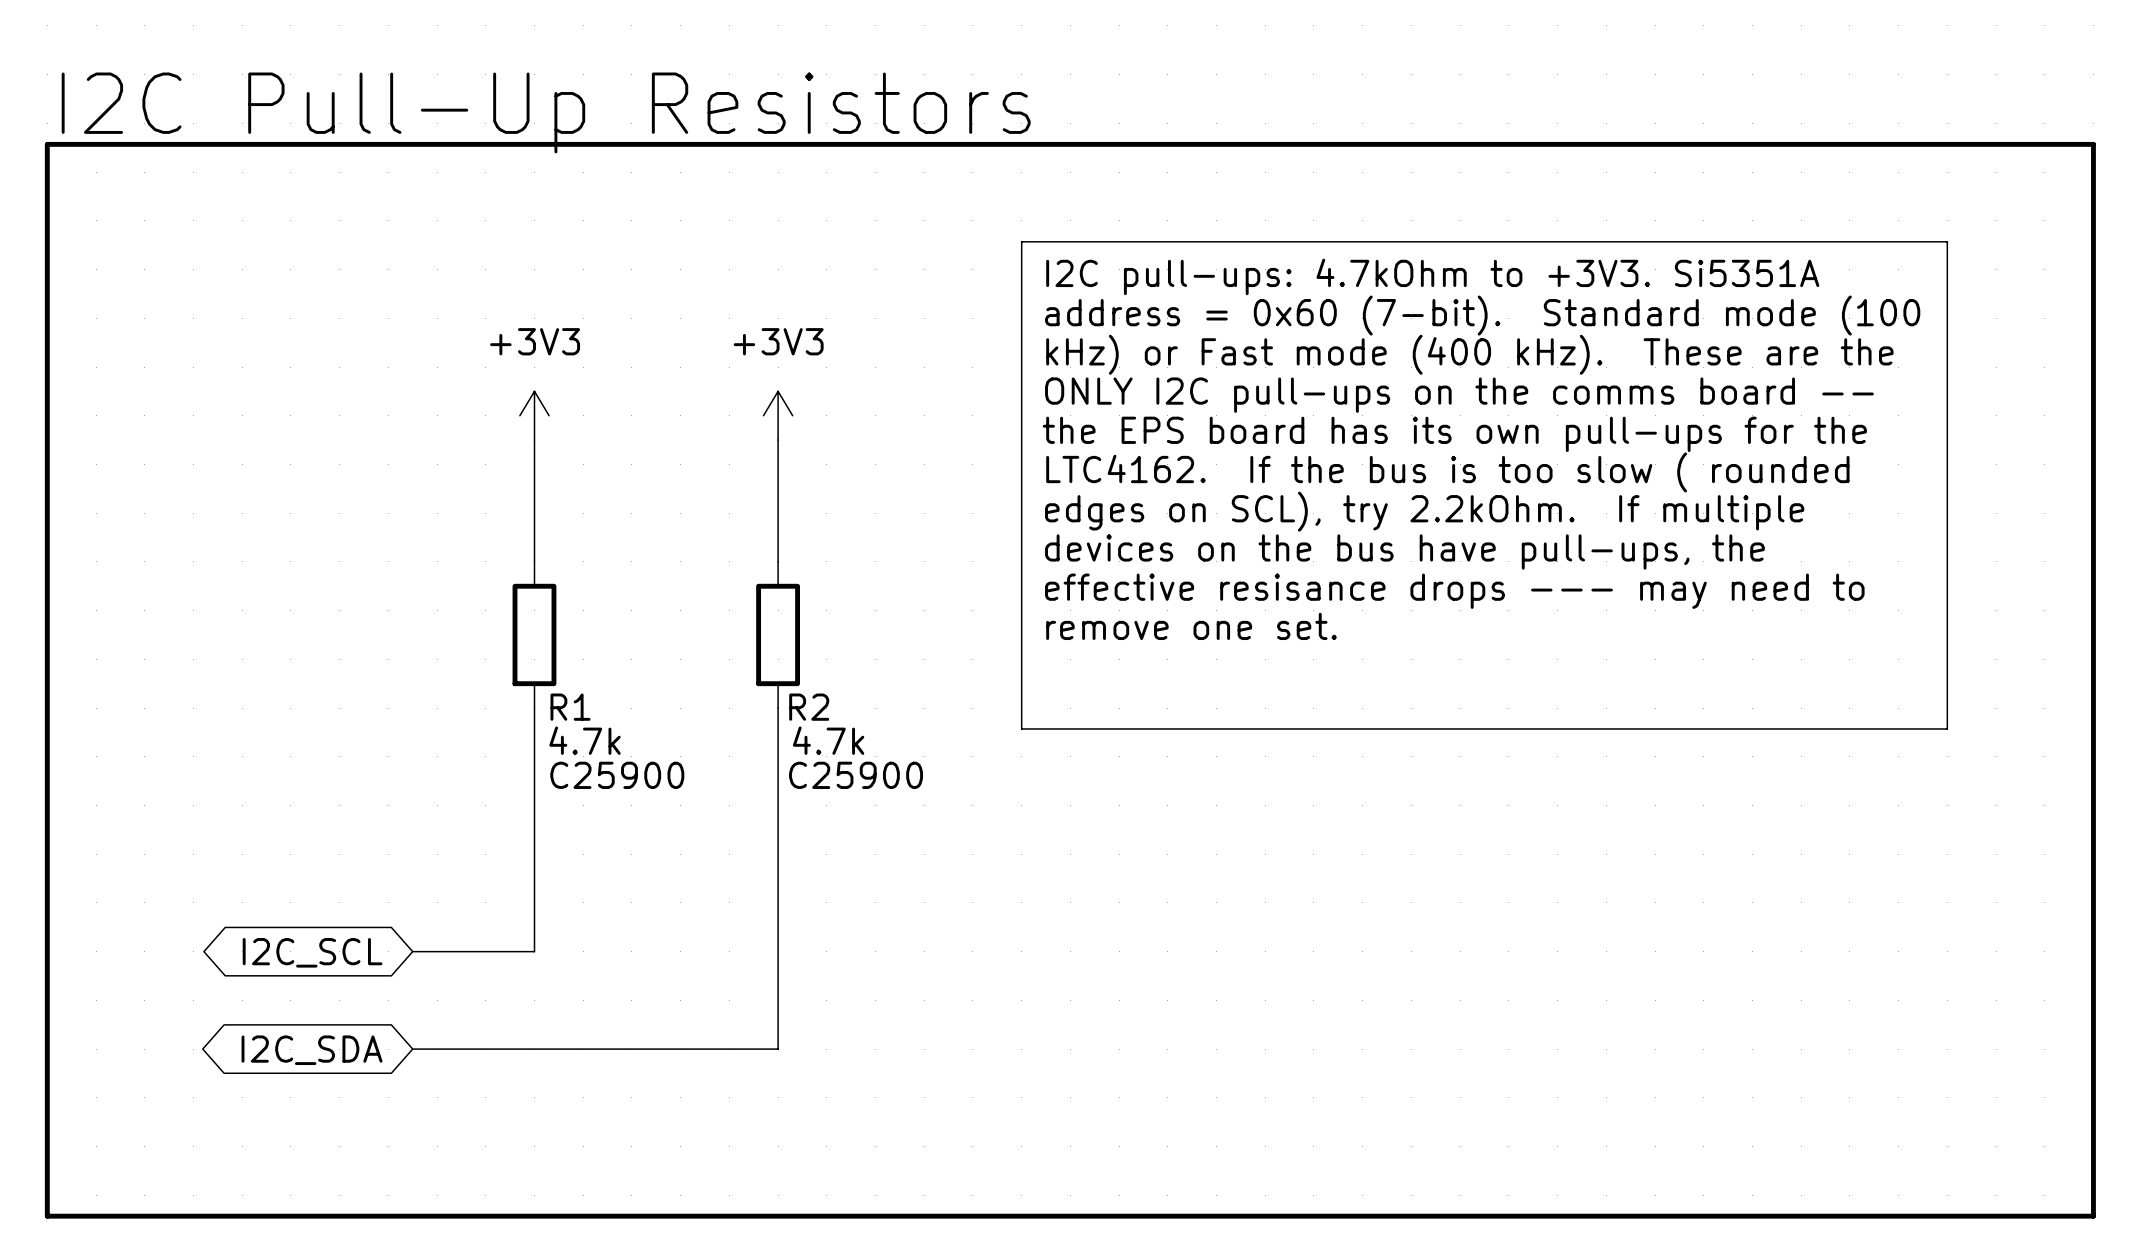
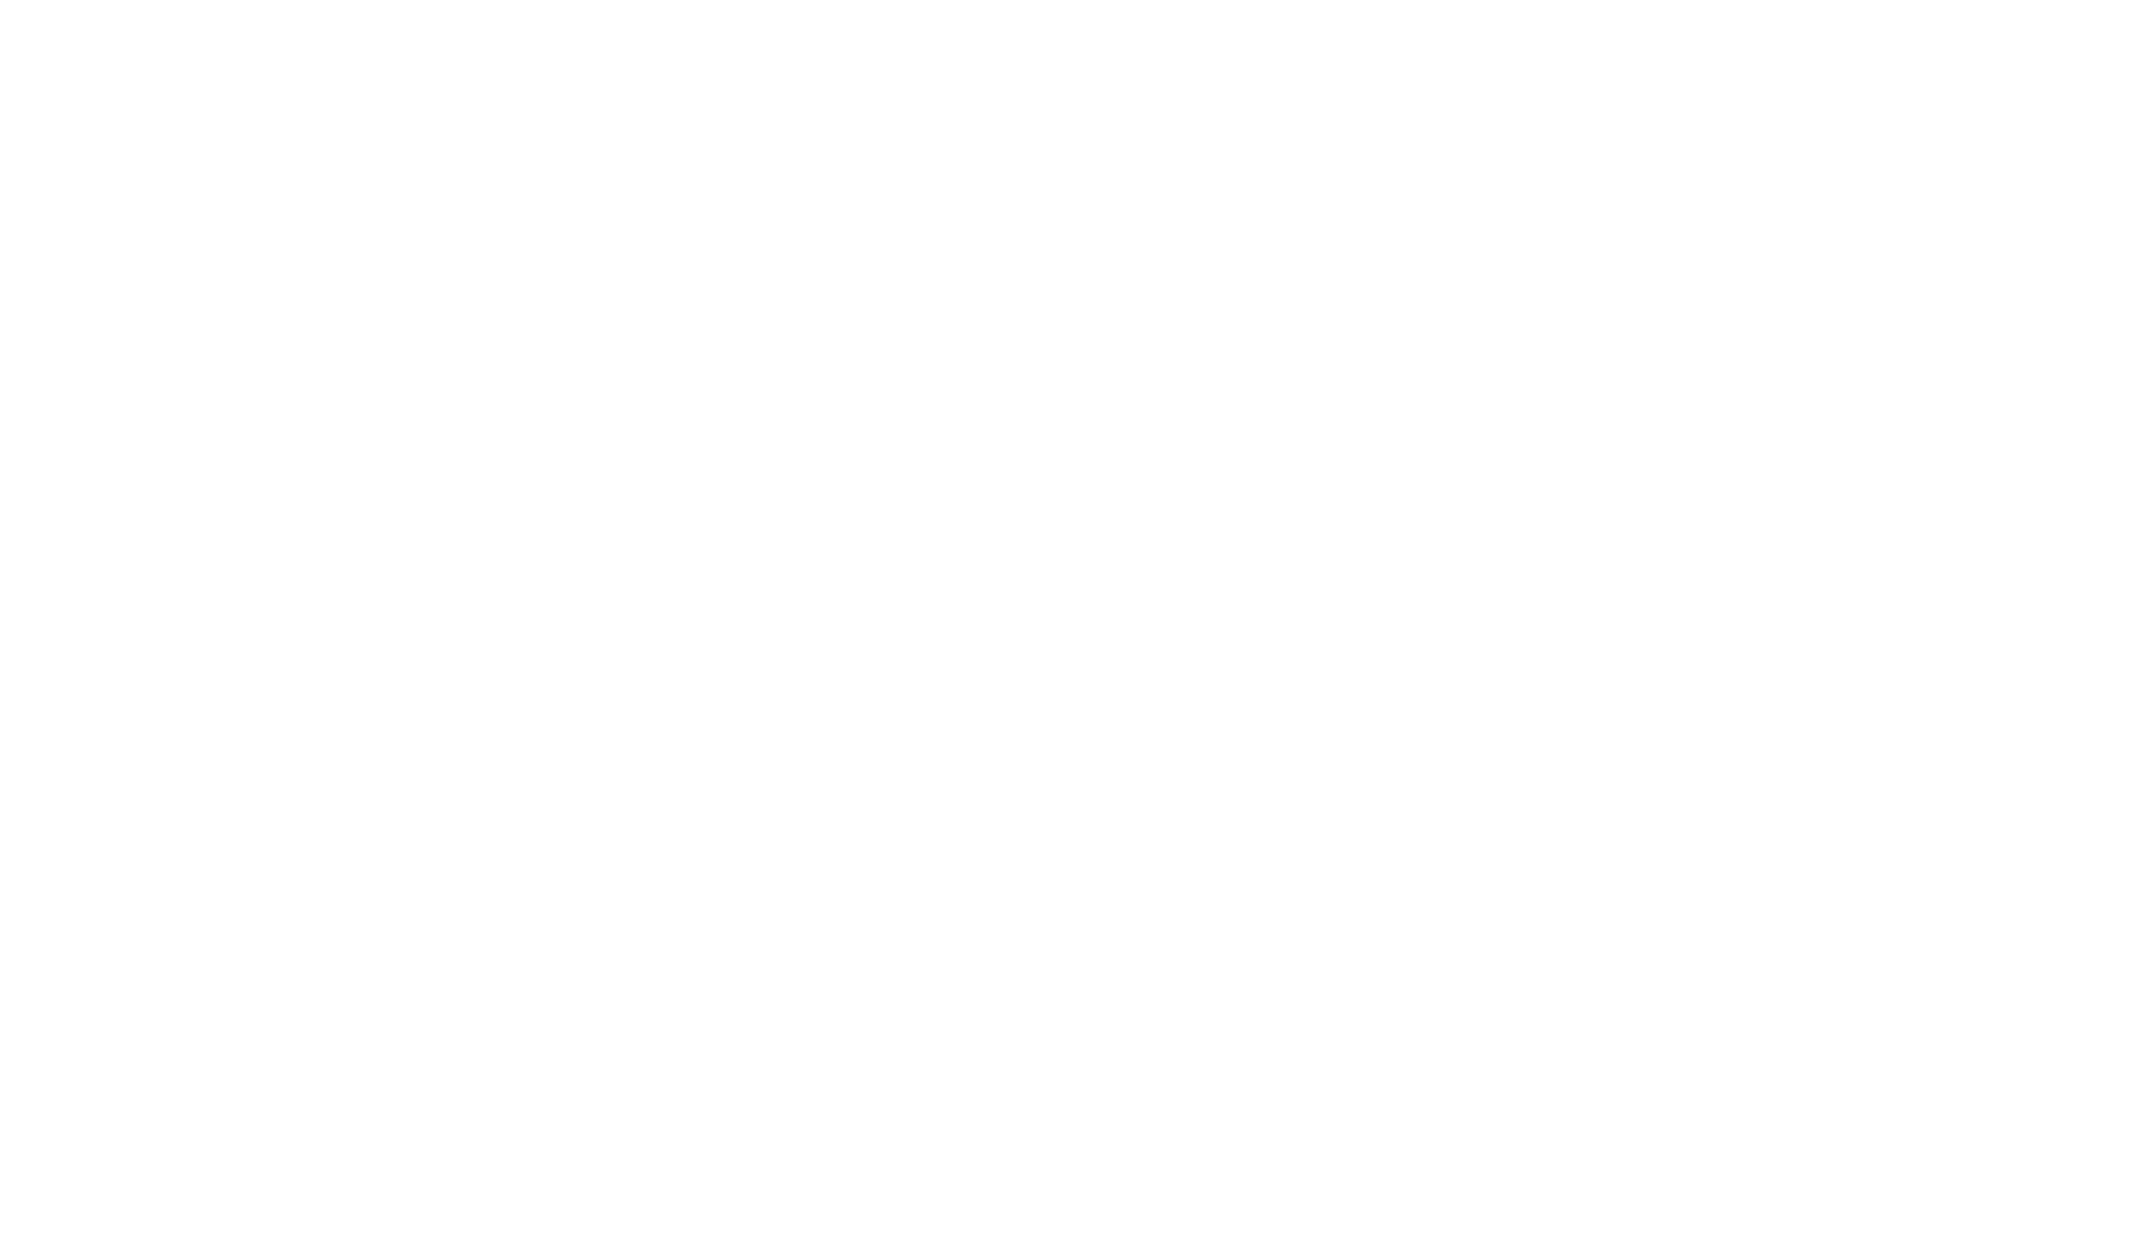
text: I2C Pull-Up Resistors (546, 112) -> none
line: (47, 144) (2093, 144) (2093, 1216) (47, 1216) (47, 144) -> none
line: (1021, 241) (1947, 241) (1947, 728) (1021, 728) (1021, 241) -> none
text: I2C pull-ups: 4.7kOhm to +3V3. Si5351A (1432, 276) -> none
text: address = 0x60 (7-bit). Standard mode (100 (1482, 315) -> none
text: kHz) or Fast mode (400 kHz). These are the (1469, 354) -> none
text: ONLY I2C pull-ups on the comms board -- (1459, 395) -> none
power symbol: +3V3 (534, 415) -> none
power symbol: +3V3 (778, 415) -> none
text: the EPS board has its own pull-ups for the (1454, 434) -> none
wire: (534, 440) (534, 561) -> none
wire: (778, 440) (778, 561) -> none
text: LTC4162. If the bus is too slow ( rounded (1447, 472) -> none
text: edges on SCL), try 2.2kOhm. If multiple (1424, 511) -> none
text: devices on the bus have pull-ups, the (1404, 552) -> none
text: effective resisance drops --- may need to (1454, 591) -> none
text: remove one set. (1191, 626) -> none
R1: 4.7k (534, 634) -> none
R2: 4.7k (778, 634) -> none
wire: (534, 708) (534, 951) (412, 951) -> none
wire: (778, 708) (778, 1049) (412, 1049) -> none
global label: I2C_SCL (312, 952) -> none
global label: I2C_SDA (312, 1050) -> none

